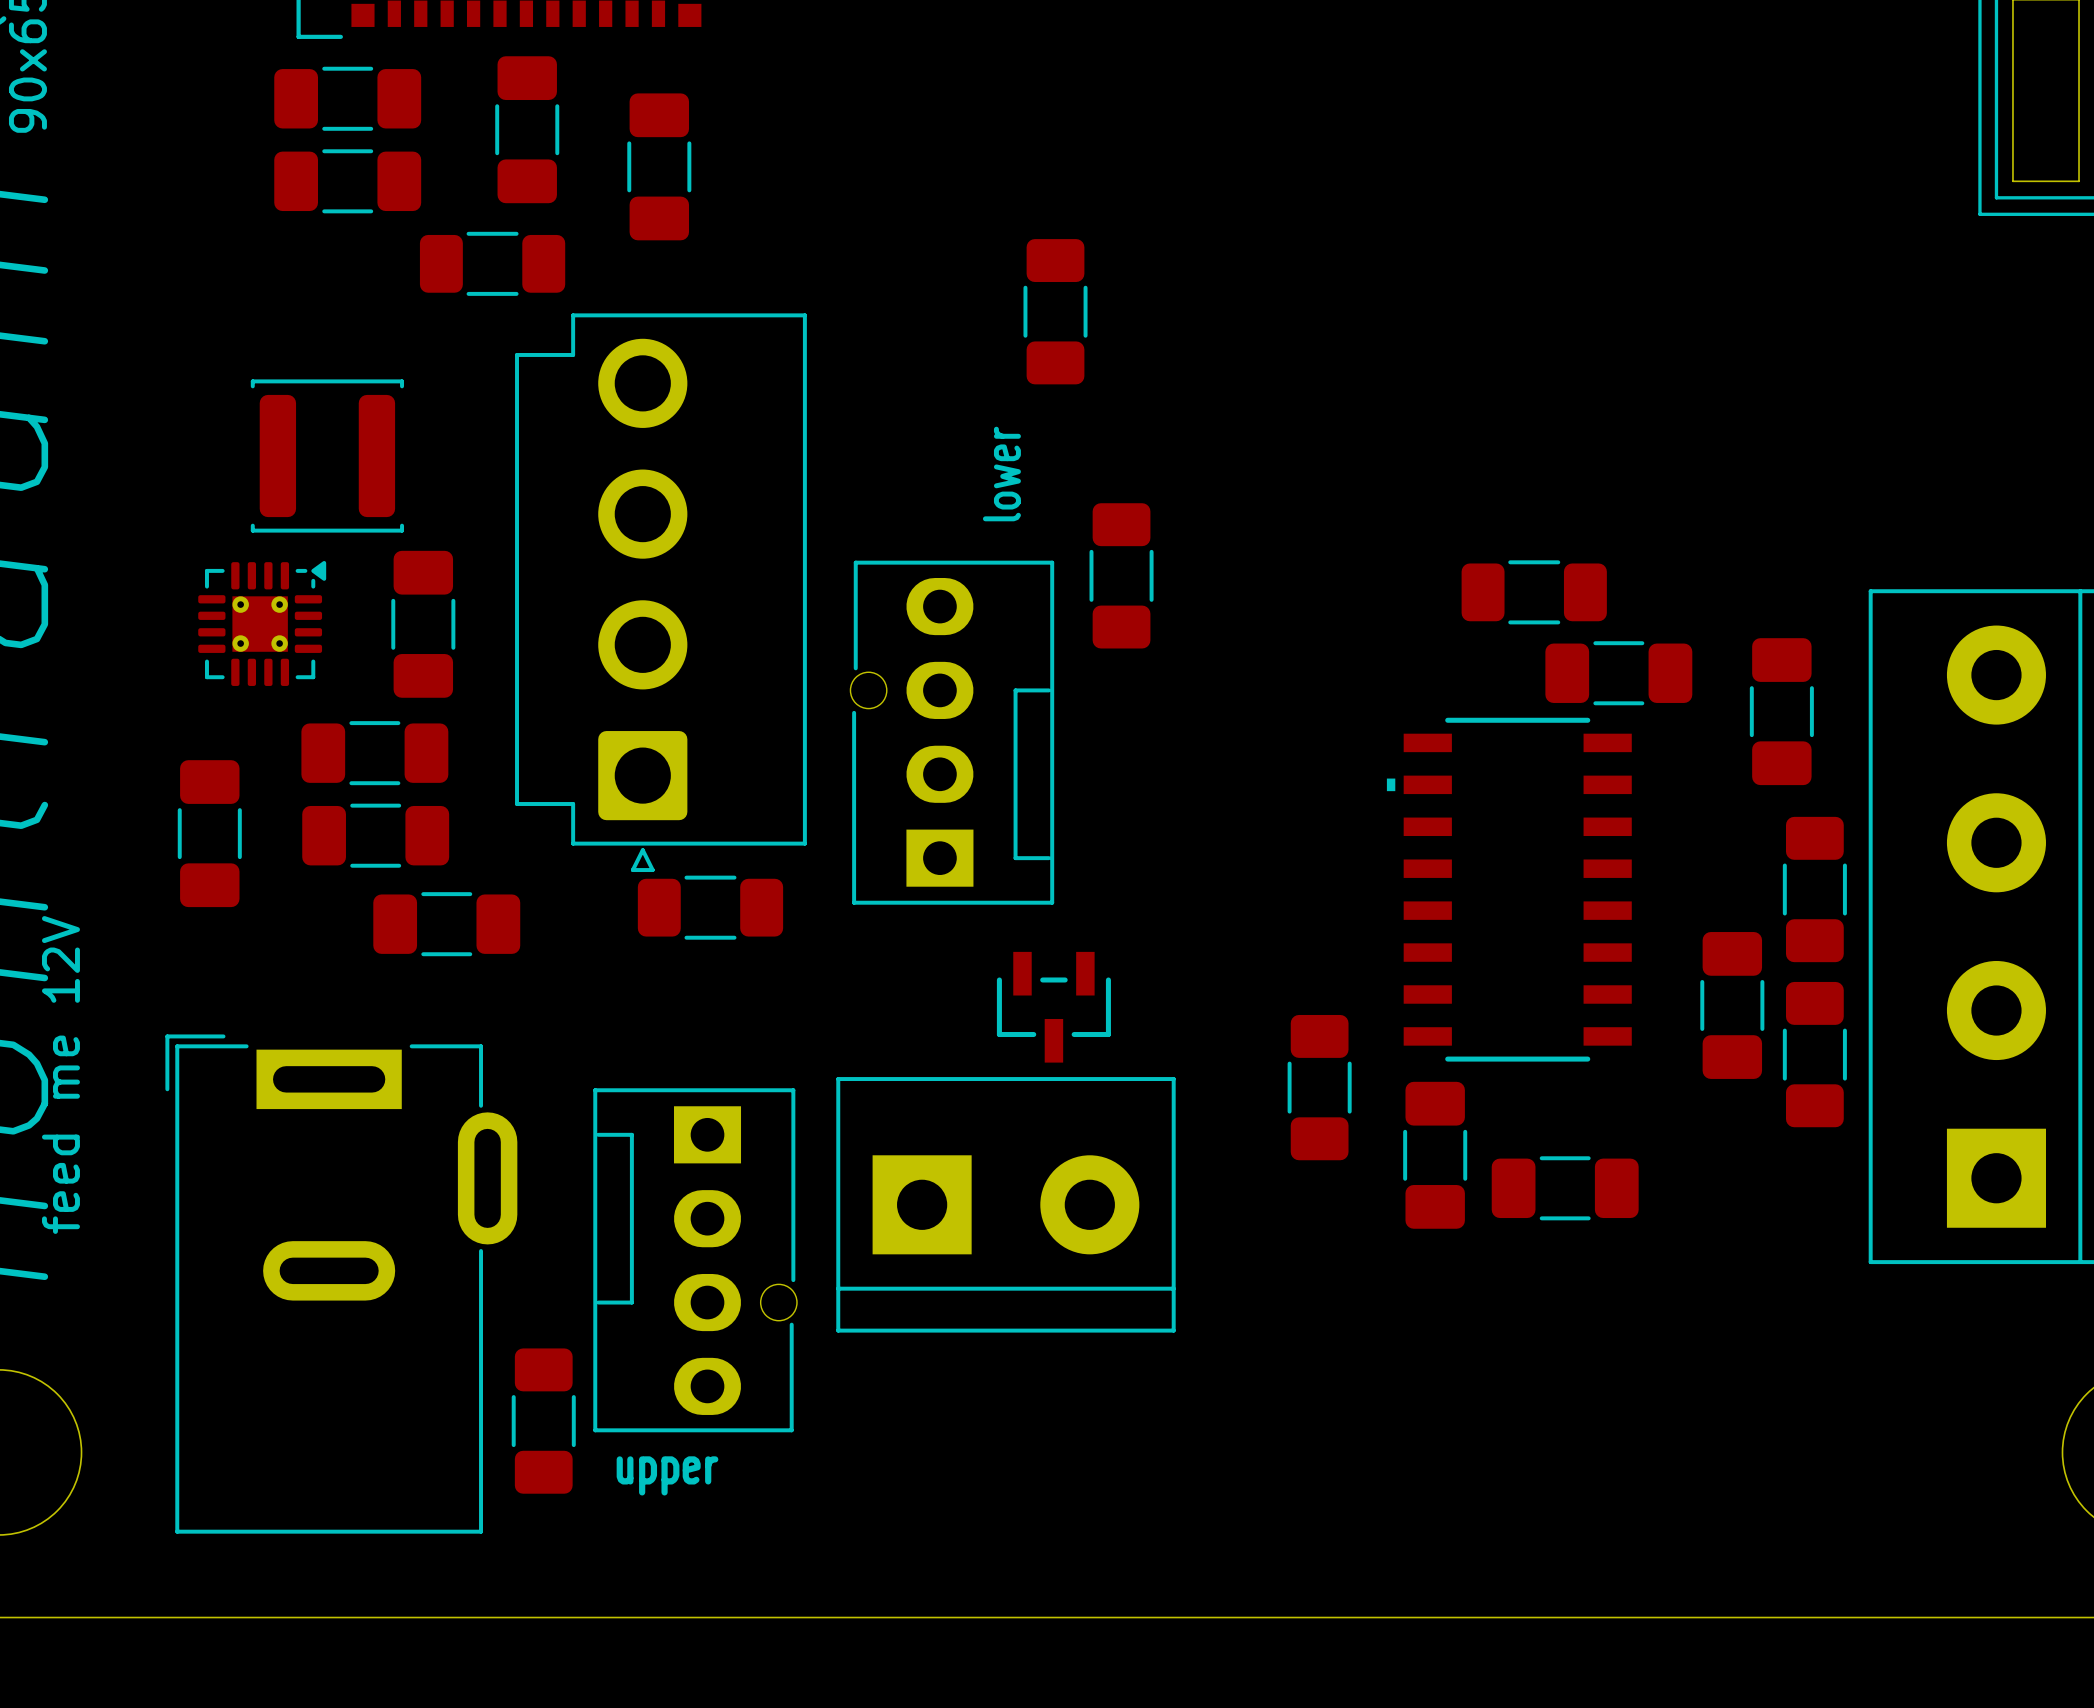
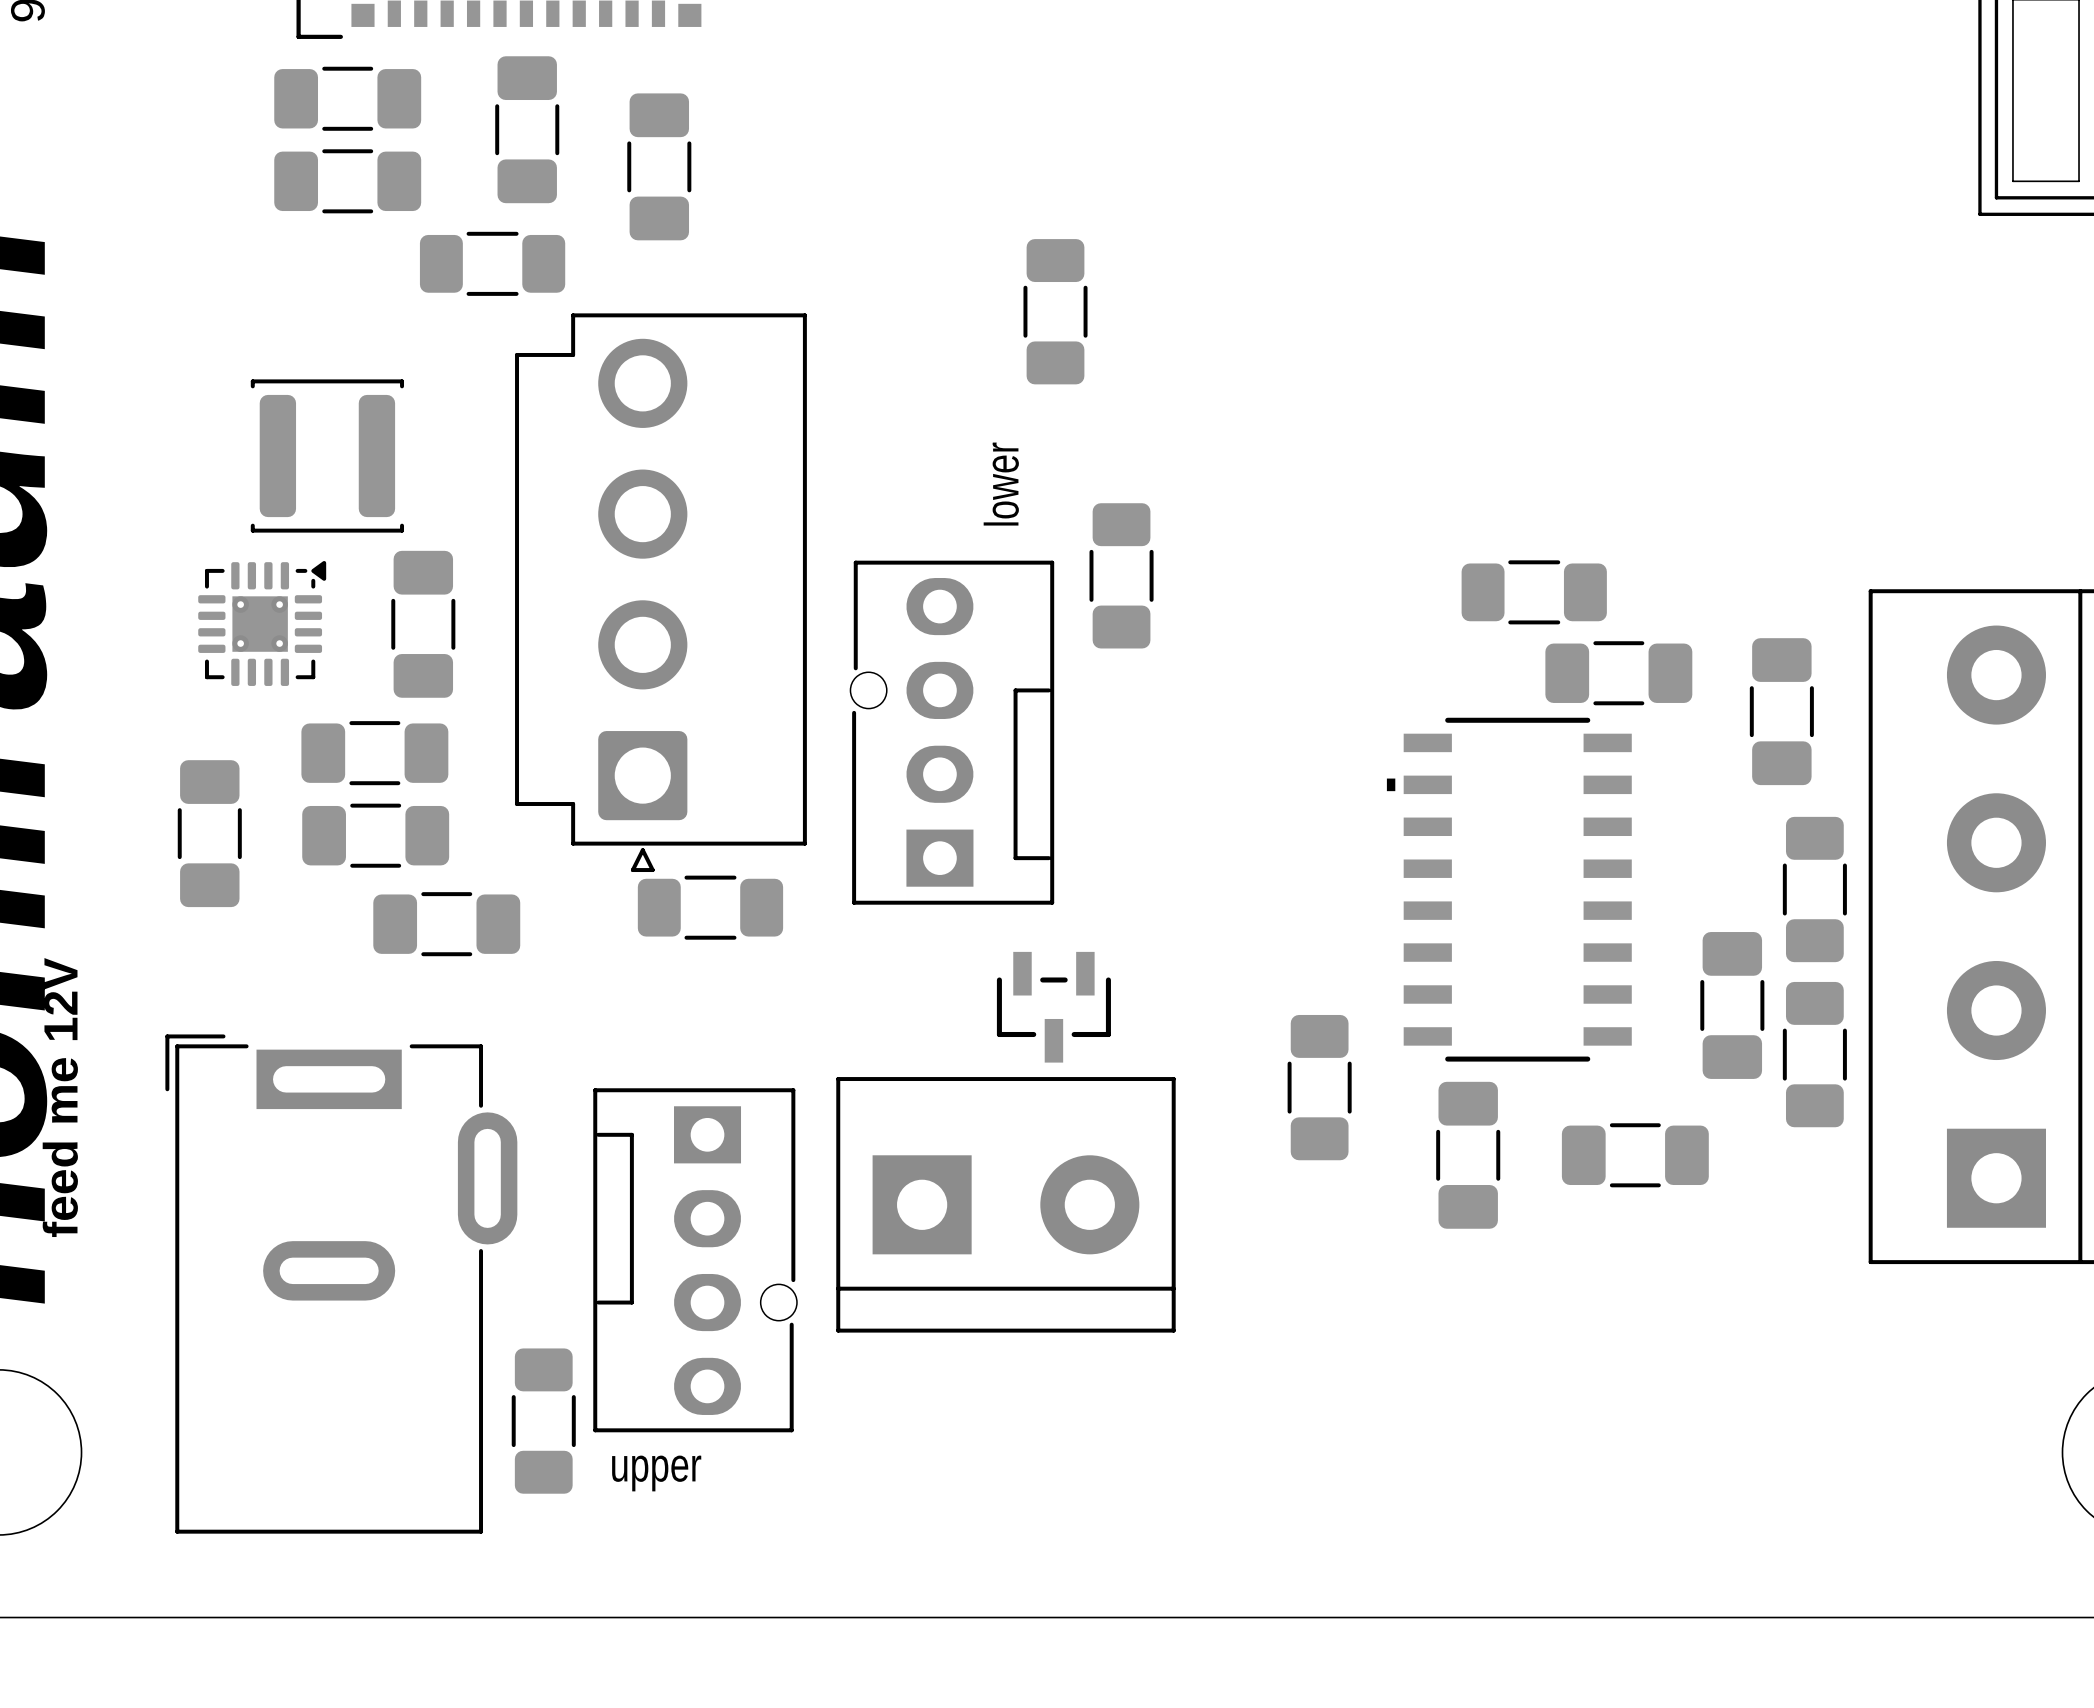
part position: (1435, 1155) -> (1468, 1155)
part position: (1565, 1188) -> (1635, 1155)

